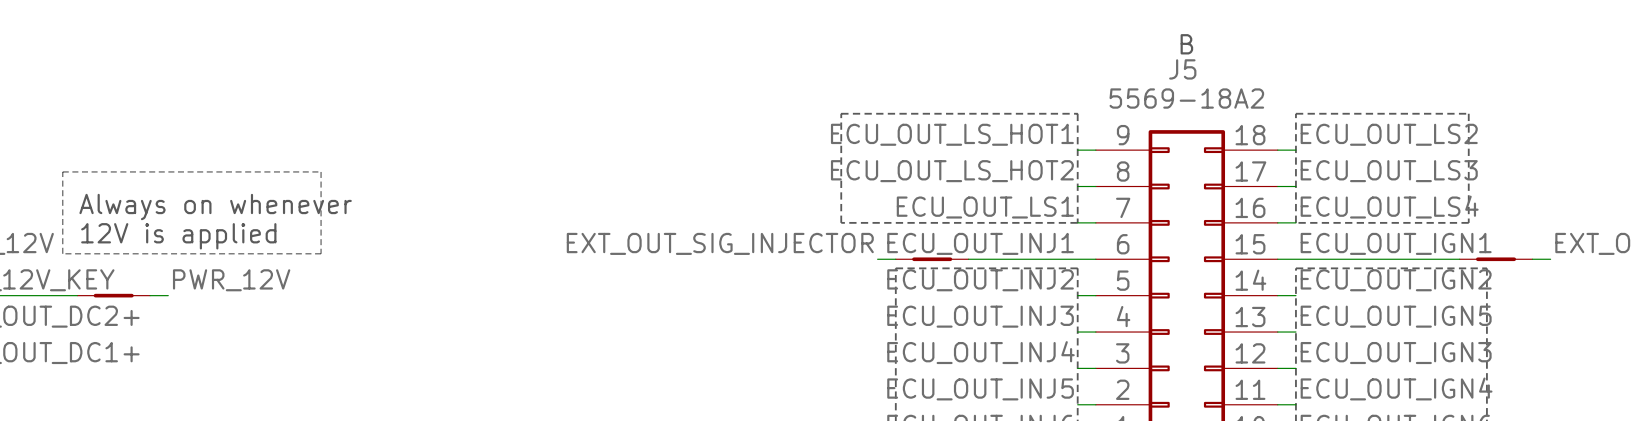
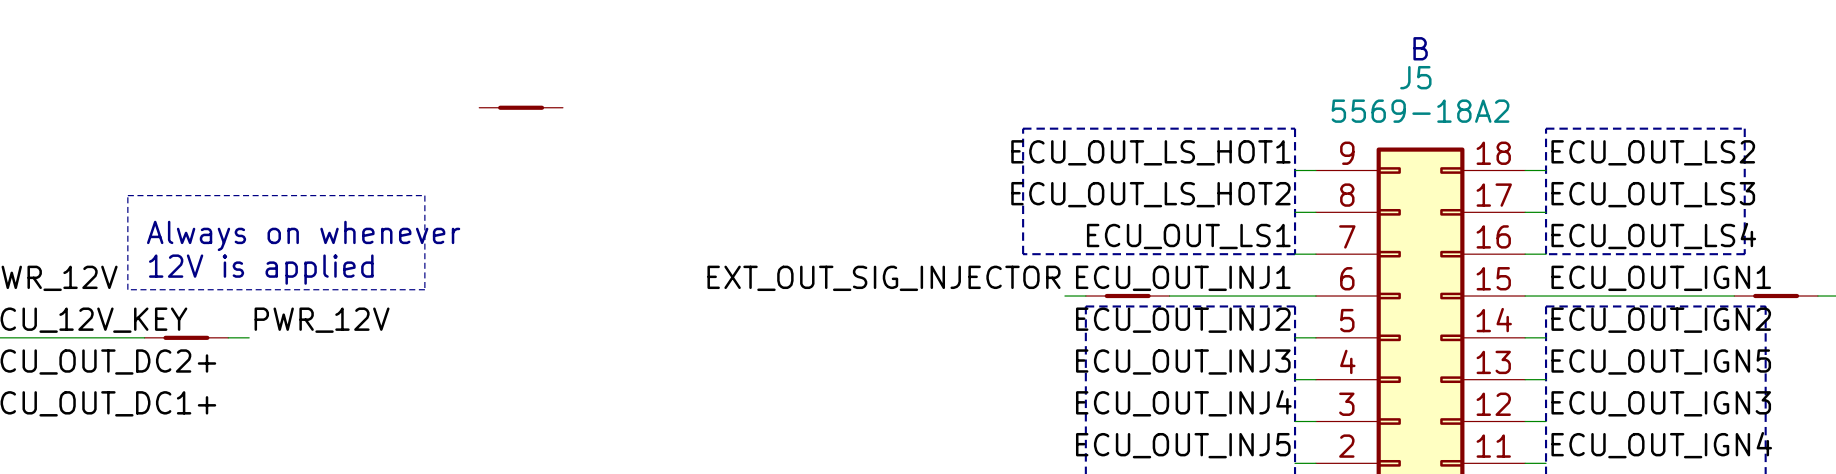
part: none -> (521, 107)

